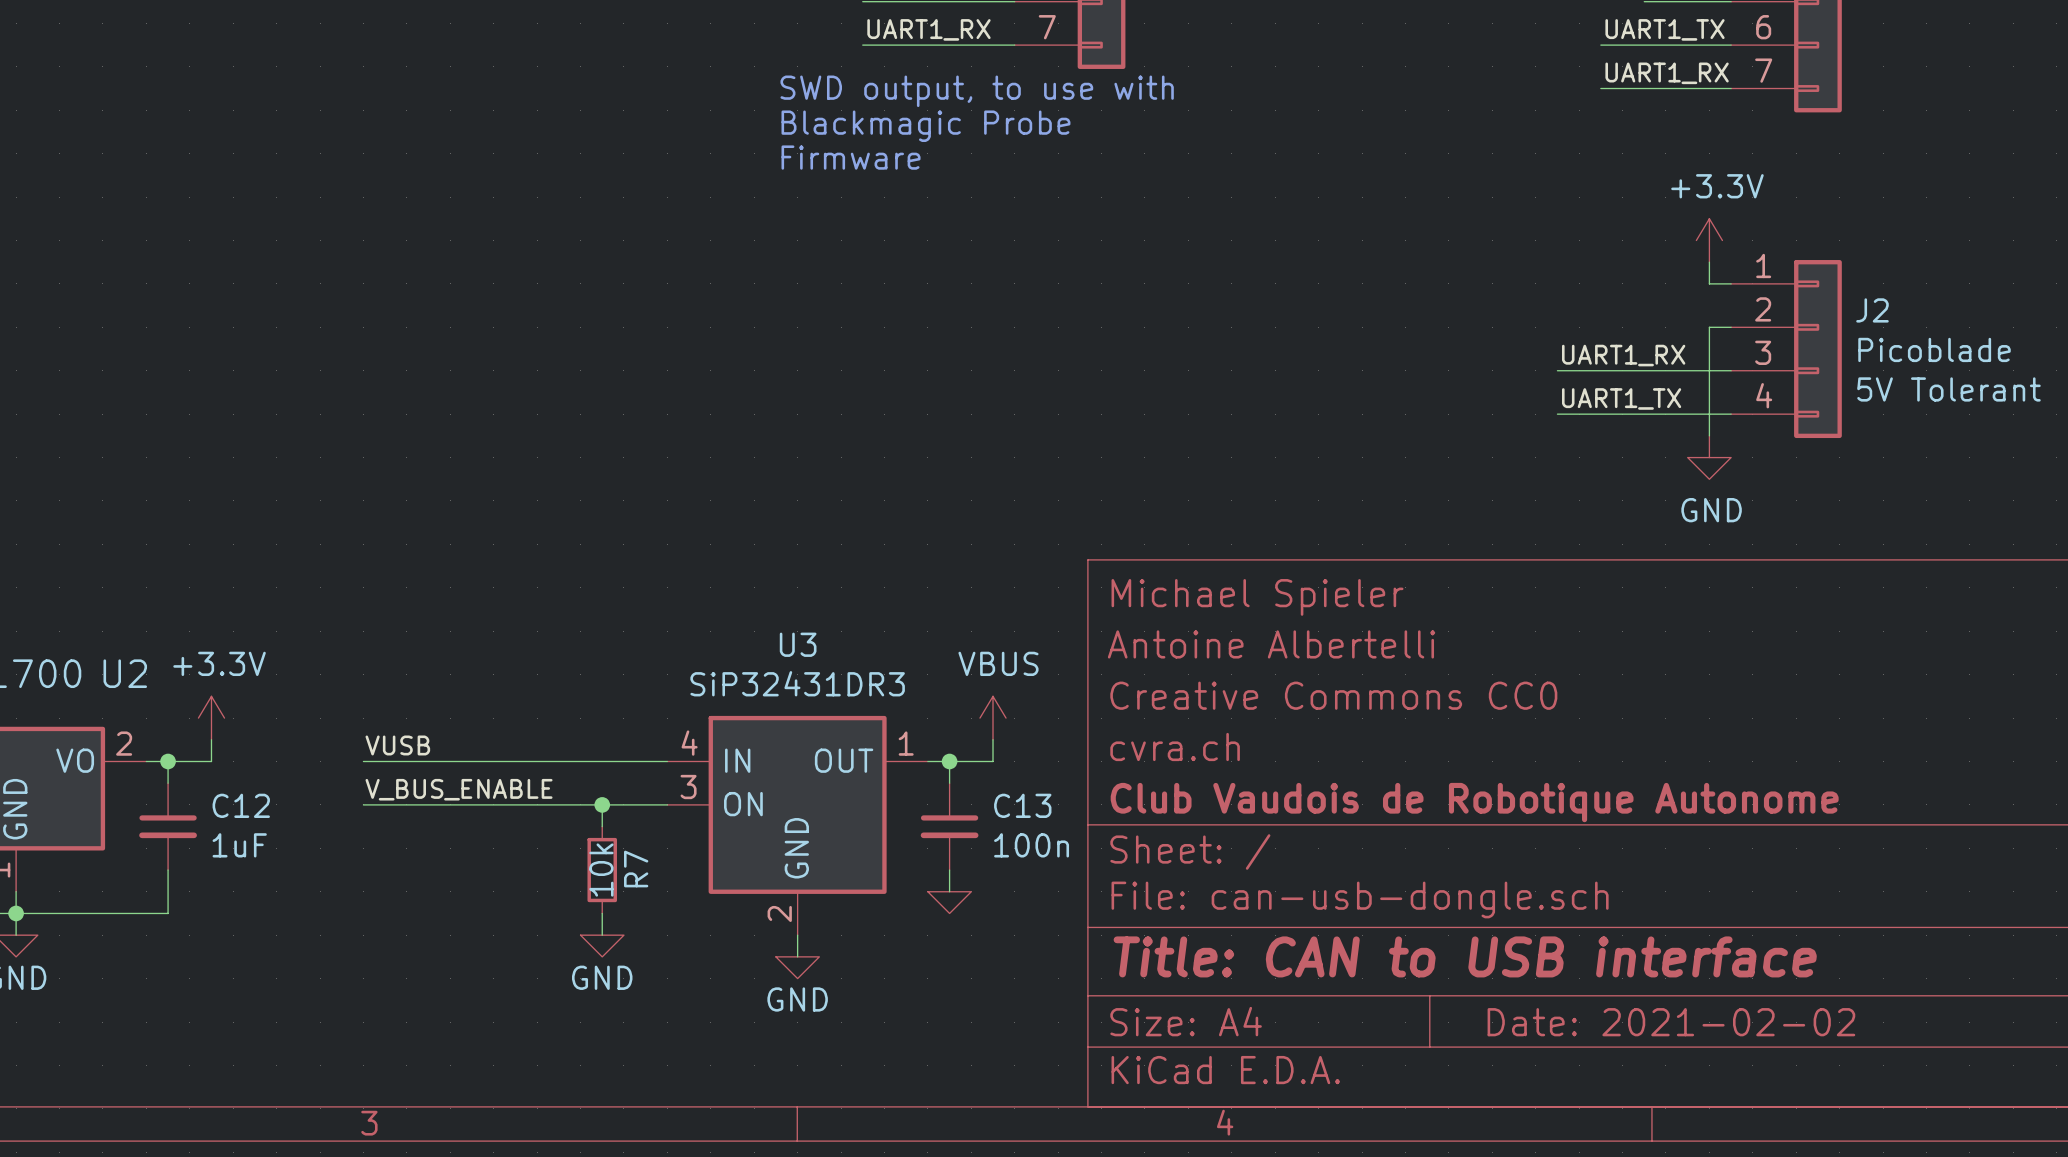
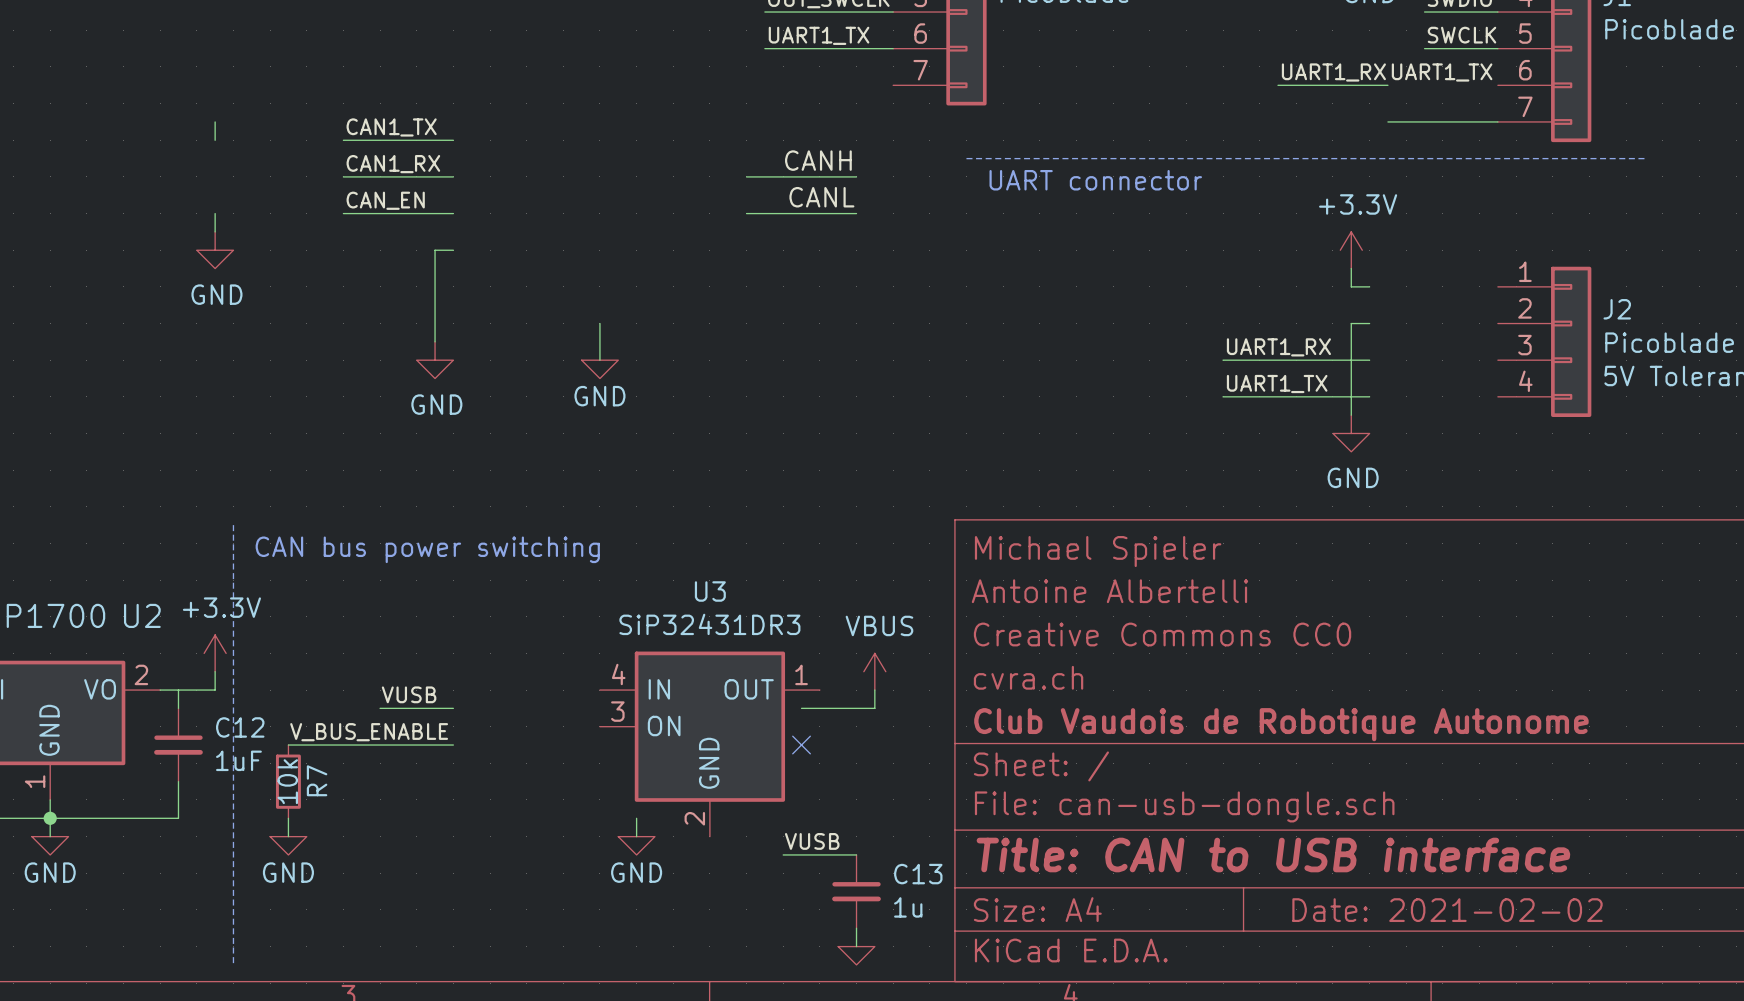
label: UART1_RX (928, 29) -> none
wire: (862, 45) (1014, 45) -> none
wire: (1600, 45) (1731, 45) -> (1387, 85) (1277, 85)
label position: UART1_RX (1667, 73) -> UART1_RX (1333, 72)
wire: none -> (215, 121) (215, 140)
text: SWD output, to use with (977, 91) -> none
label: none -> CAN1_TX (391, 127)
wire: none -> (343, 140) (453, 140)
text: Blackmagic Probe (925, 126) -> none
line: none -> (966, 158) (1644, 158)
label: none -> CANH (818, 160)
label: none -> CAN1_RX (393, 164)
wire: none -> (343, 176) (453, 176)
wire: none -> (746, 176) (856, 176)
text: Firmware (851, 157) -> none
text: none -> UART connector (1095, 180)
label: none -> CANL (821, 197)
label: none -> CAN_EN (385, 200)
wire: none -> (215, 213) (215, 231)
wire: none -> (343, 213) (453, 213)
wire: none -> (746, 213) (856, 213)
power symbol: none -> GND (215, 250)
wire: none -> (453, 250) (435, 250) (435, 341)
power symbol position: +3.3V (1709, 240) -> +3.3V (1351, 250)
wire: (1709, 262) (1709, 283) (1731, 283) -> (1351, 268) (1351, 286) (1369, 286)
wire: none -> (599, 323) (599, 360)
wire: (1731, 327) (1709, 327) (1709, 435) -> (1369, 323) (1351, 323) (1351, 415)
label position: UART1_RX (1623, 355) -> UART1_RX (1278, 347)
power symbol: none -> GND (435, 360)
wire: (1579, 370) (1731, 370) -> (1223, 360) (1351, 360)
power symbol: none -> GND (599, 369)
label position: UART1_TX (1621, 398) -> UART1_TX (1277, 384)
wire: (1579, 414) (1731, 414) -> (1223, 396) (1351, 396)
power symbol position: GND (1709, 457) -> GND (1351, 433)
line: none -> (233, 525) (233, 964)
text: none -> CAN bus power switching (427, 549)
power symbol position: VBUS (993, 718) -> VBUS (874, 671)
wire: (993, 739) (993, 761) (927, 761) -> none
label position: VUSB (397, 745) -> VUSB (409, 694)
junction: (168, 761) -> none
wire: (363, 761) (667, 761) -> none
wire: (949, 761) (949, 783) -> (856, 928) (856, 946)
junction: (949, 761) -> none
wire: none -> (874, 690) (874, 708) (801, 708)
wire: none -> (380, 708) (453, 708)
label position: V_BUS_ENABLE (459, 789) -> V_BUS_ENABLE (369, 732)
wire: (363, 804) (667, 804) -> none
wire: (602, 804) (602, 826) -> none
junction: (602, 804) -> none
wire: none -> (288, 745) (453, 745)
no-connect mark: none -> (801, 745)
C13 position: (949, 826) -> (856, 891)
C13 value: 100n (1031, 845) -> 1u (908, 907)
R7 position: (602, 870) -> (288, 781)
wire: (949, 870) (949, 891) -> none
power symbol position: (949, 902) -> (856, 955)
wire: (602, 913) (602, 935) -> (288, 818) (288, 836)
wire: (797, 935) (797, 956) -> (636, 818) (636, 836)
label: none -> VUSB (812, 841)
power symbol: none -> GND (288, 845)
power symbol: GND (602, 946) -> none
power symbol: none -> GND (636, 845)
wire: none -> (783, 854) (856, 854)
power symbol: GND (797, 967) -> none

